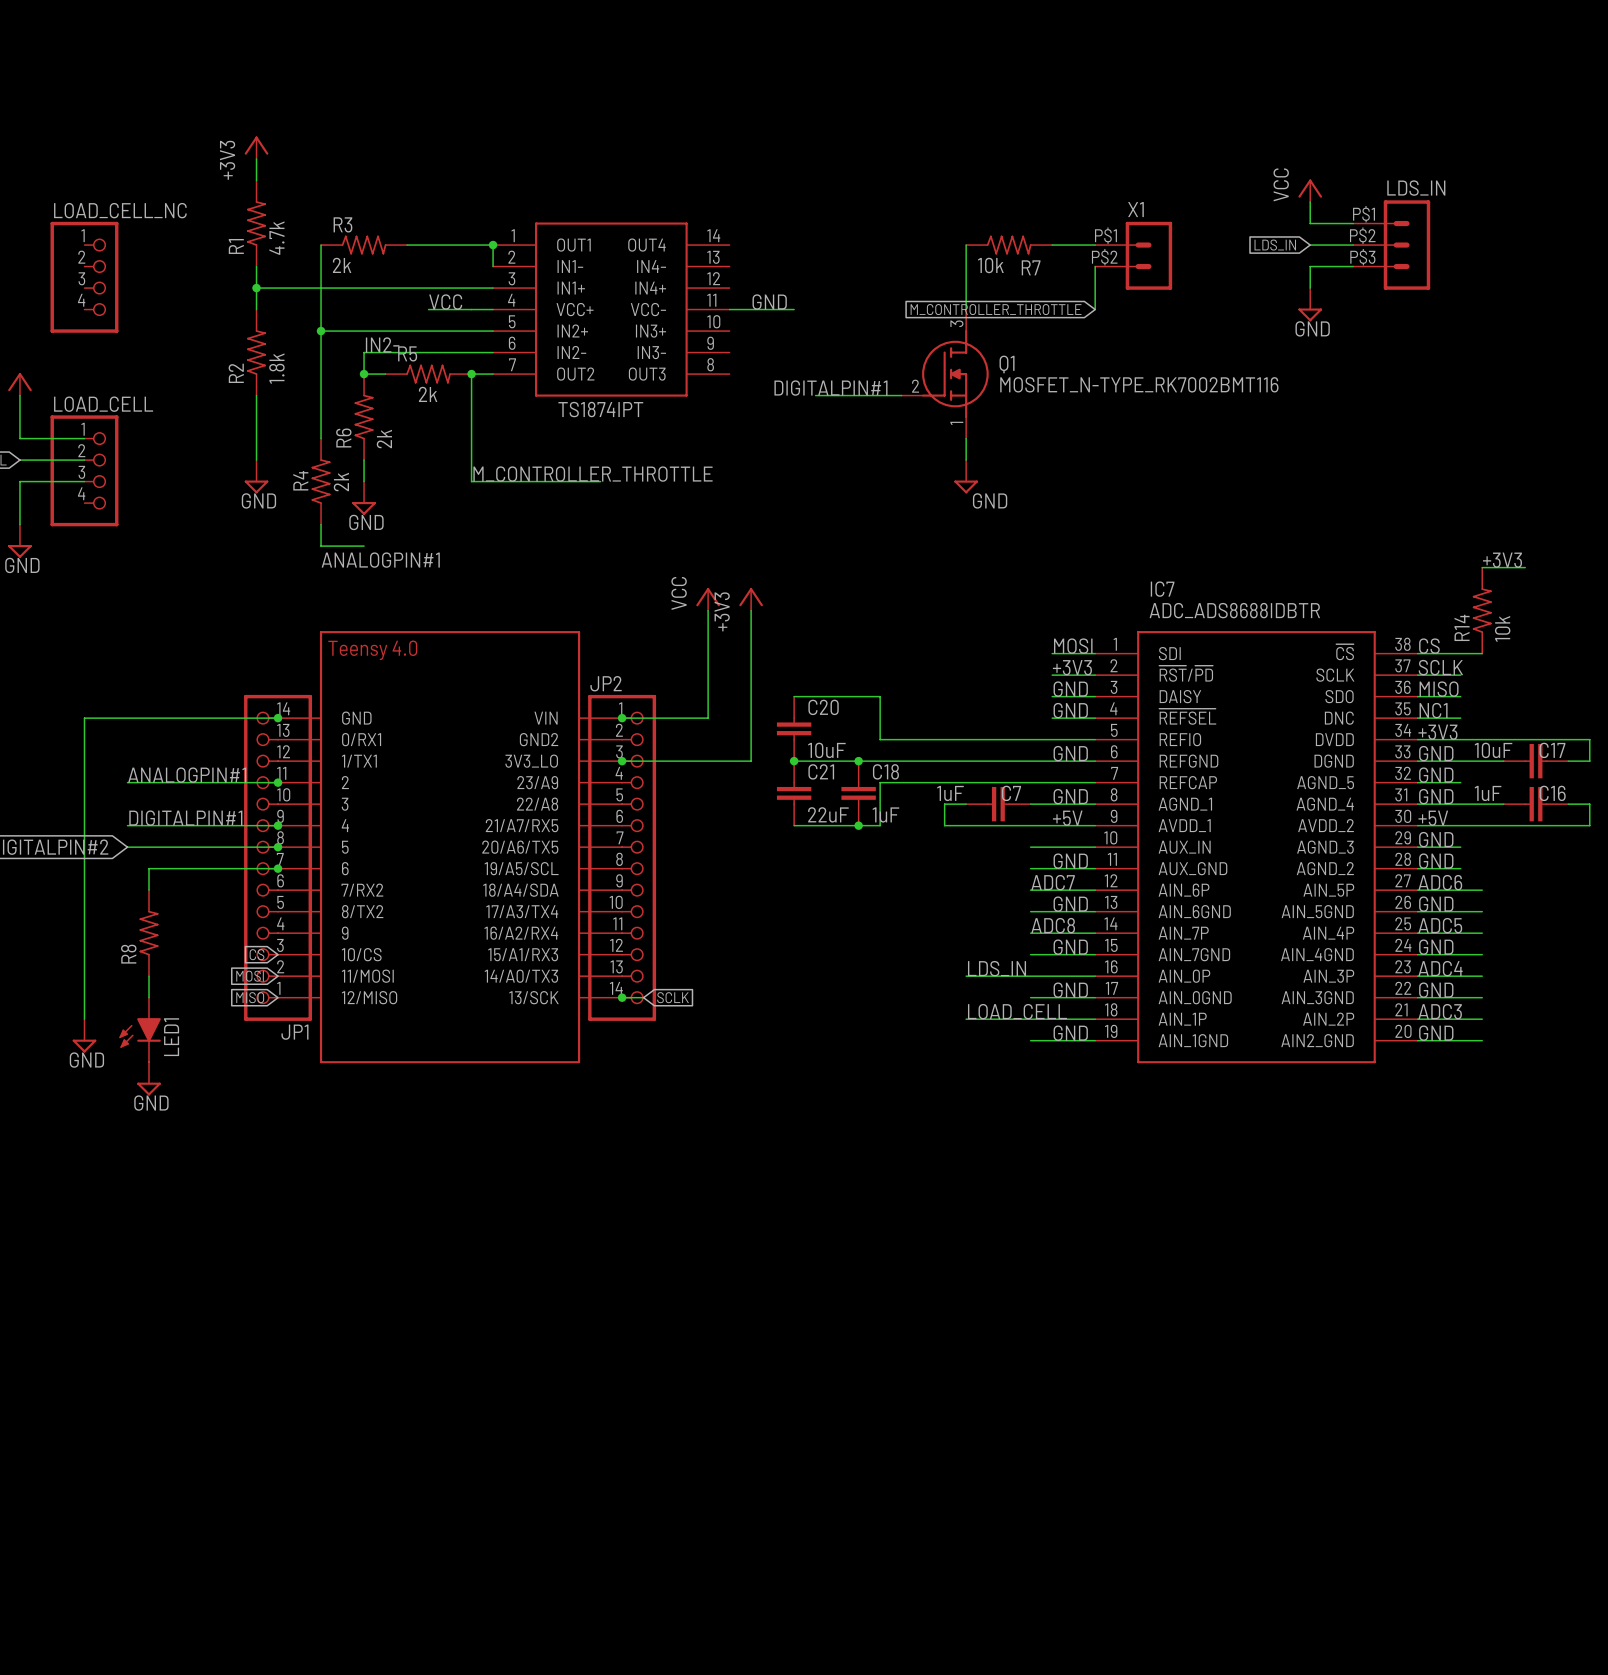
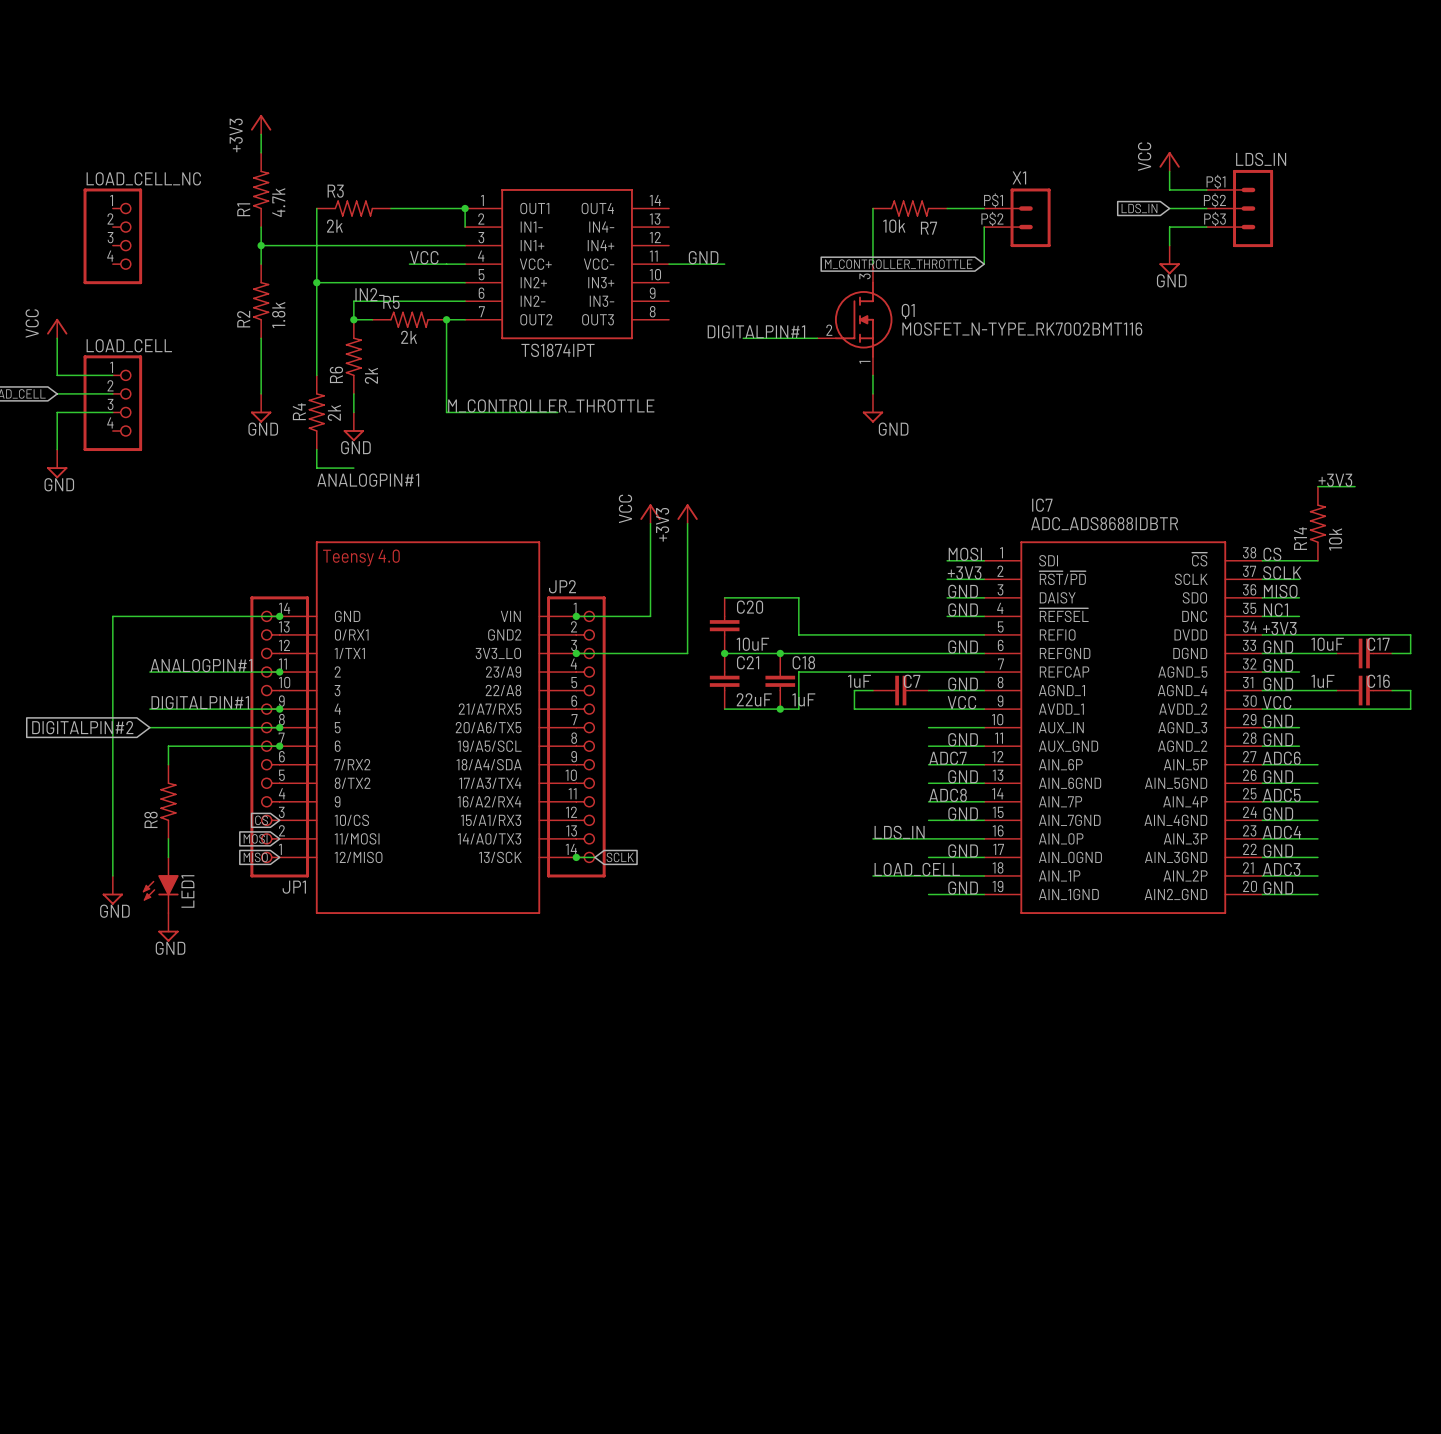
label: +5V (1067, 818) -> VCC (961, 702)
label: +5V (1433, 818) -> VCC (1277, 702)

